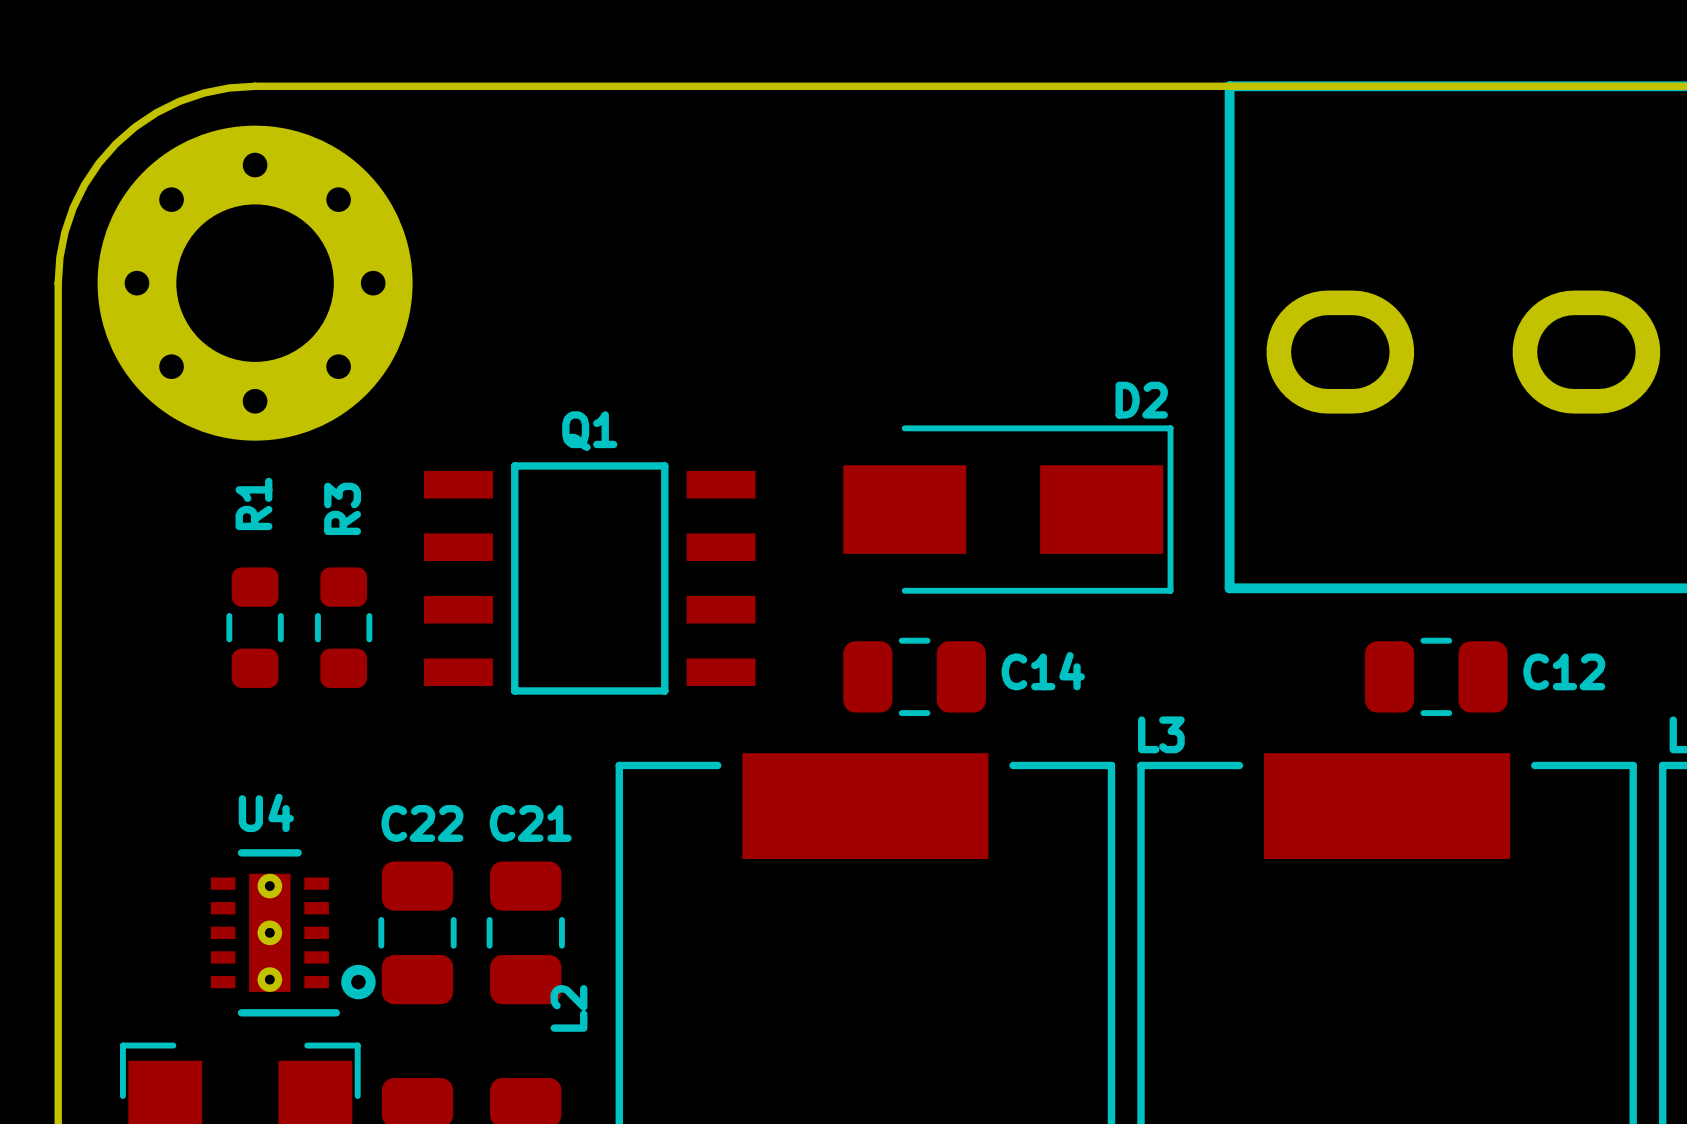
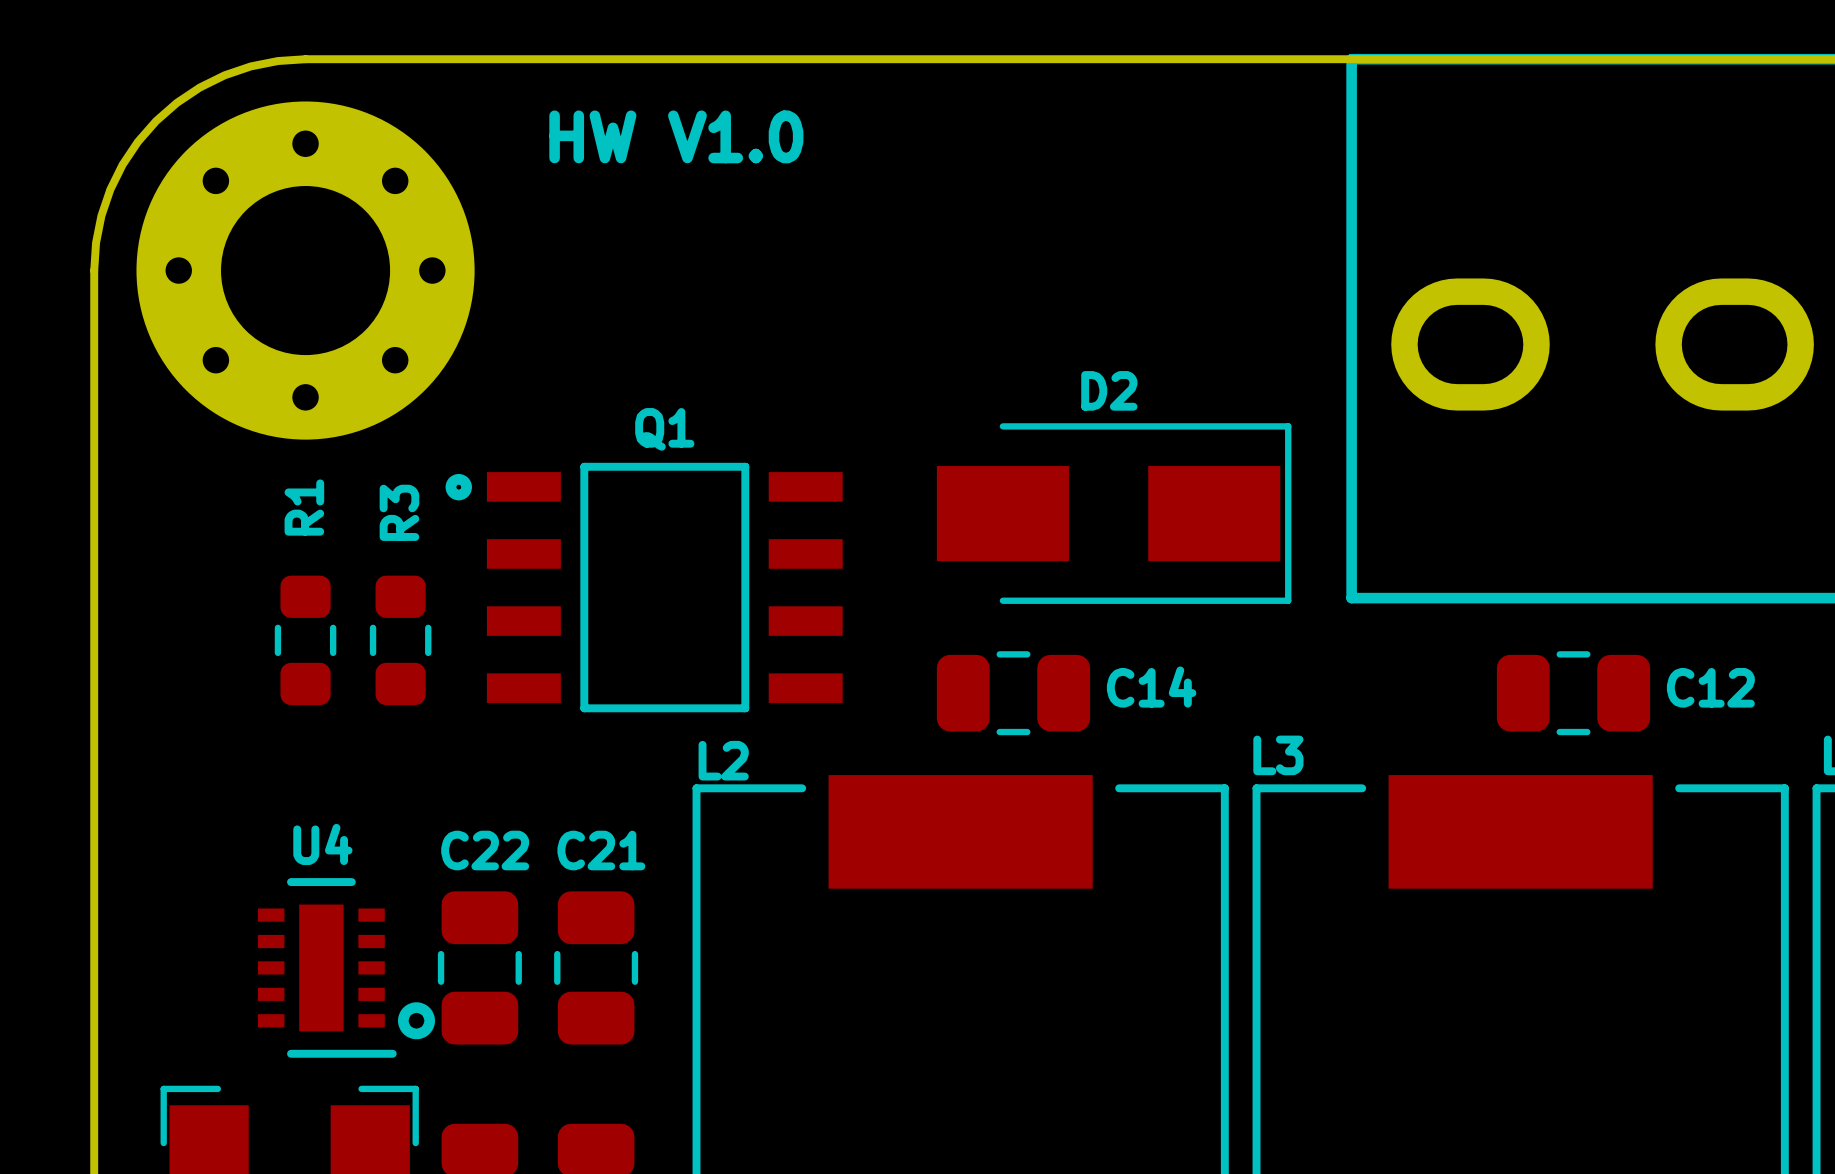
text: none -> HW V1.0 (676, 136)
D2 name position: D2 (1141, 400) -> D2 (1109, 390)
drawing: none -> [445, 473, 472, 501]
U4 footprint: [210, 849, 340, 1017] -> [258, 878, 397, 1058]
L2 name rotation: 0° (568, 1008) -> 90° clockwise (723, 760)
L2 name position: L2 (568, 1008) -> L2 (723, 760)

